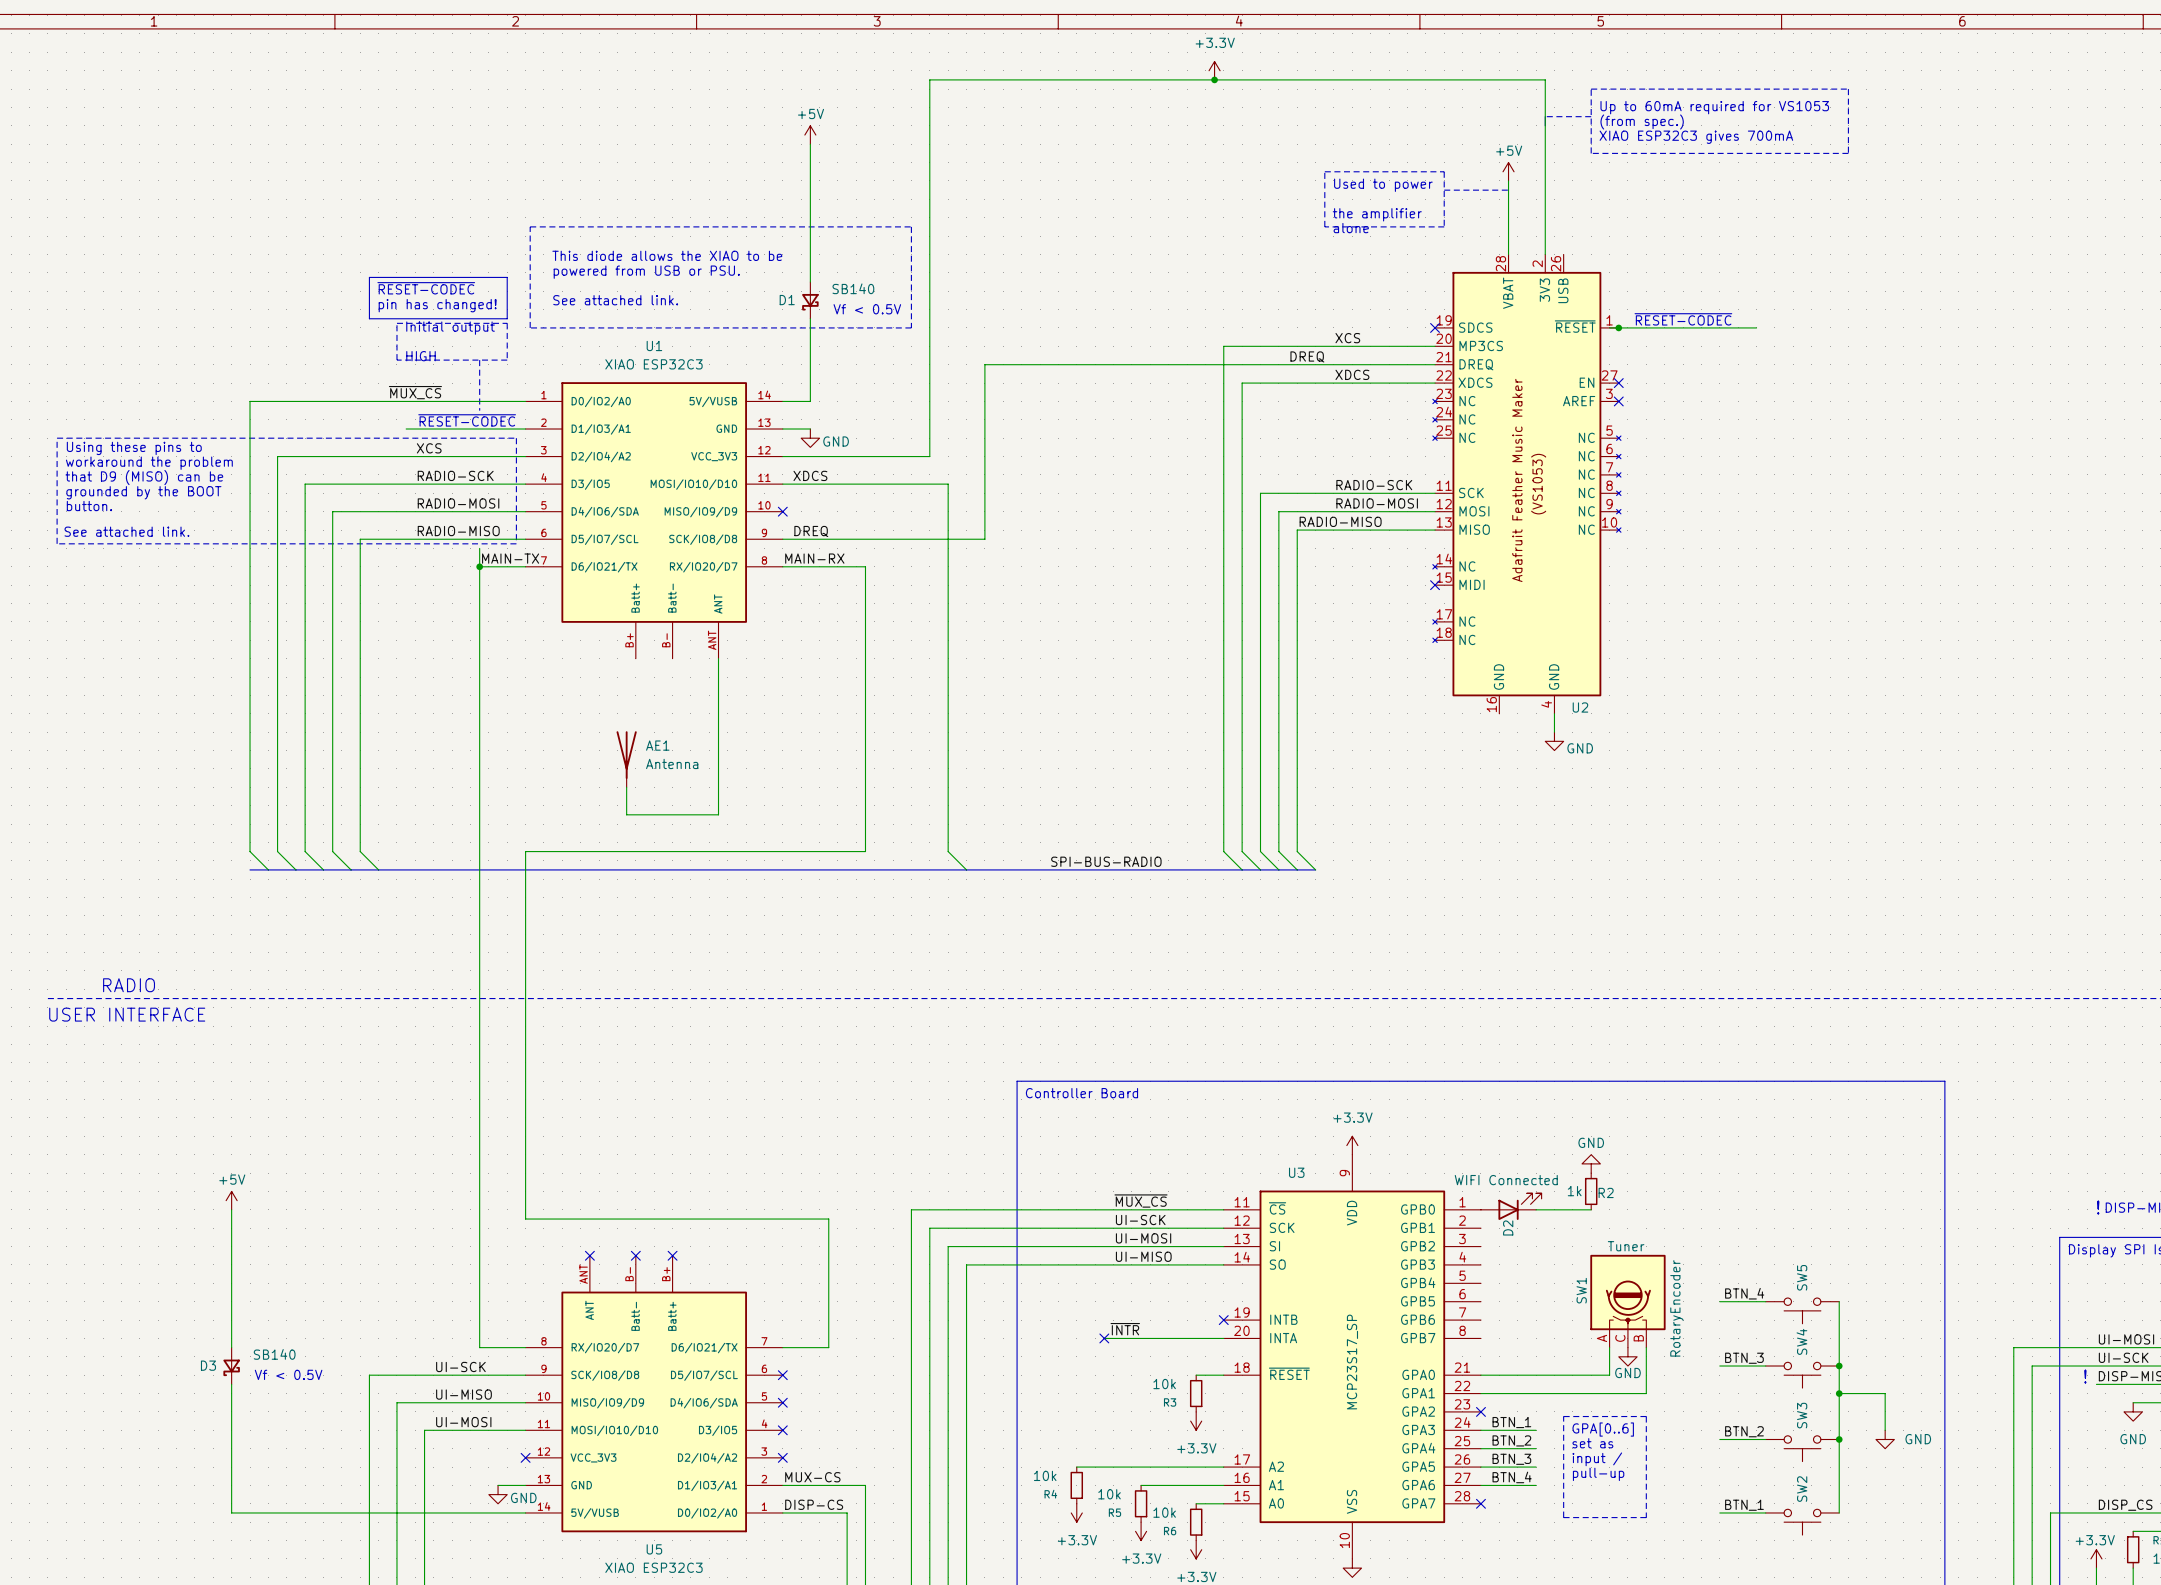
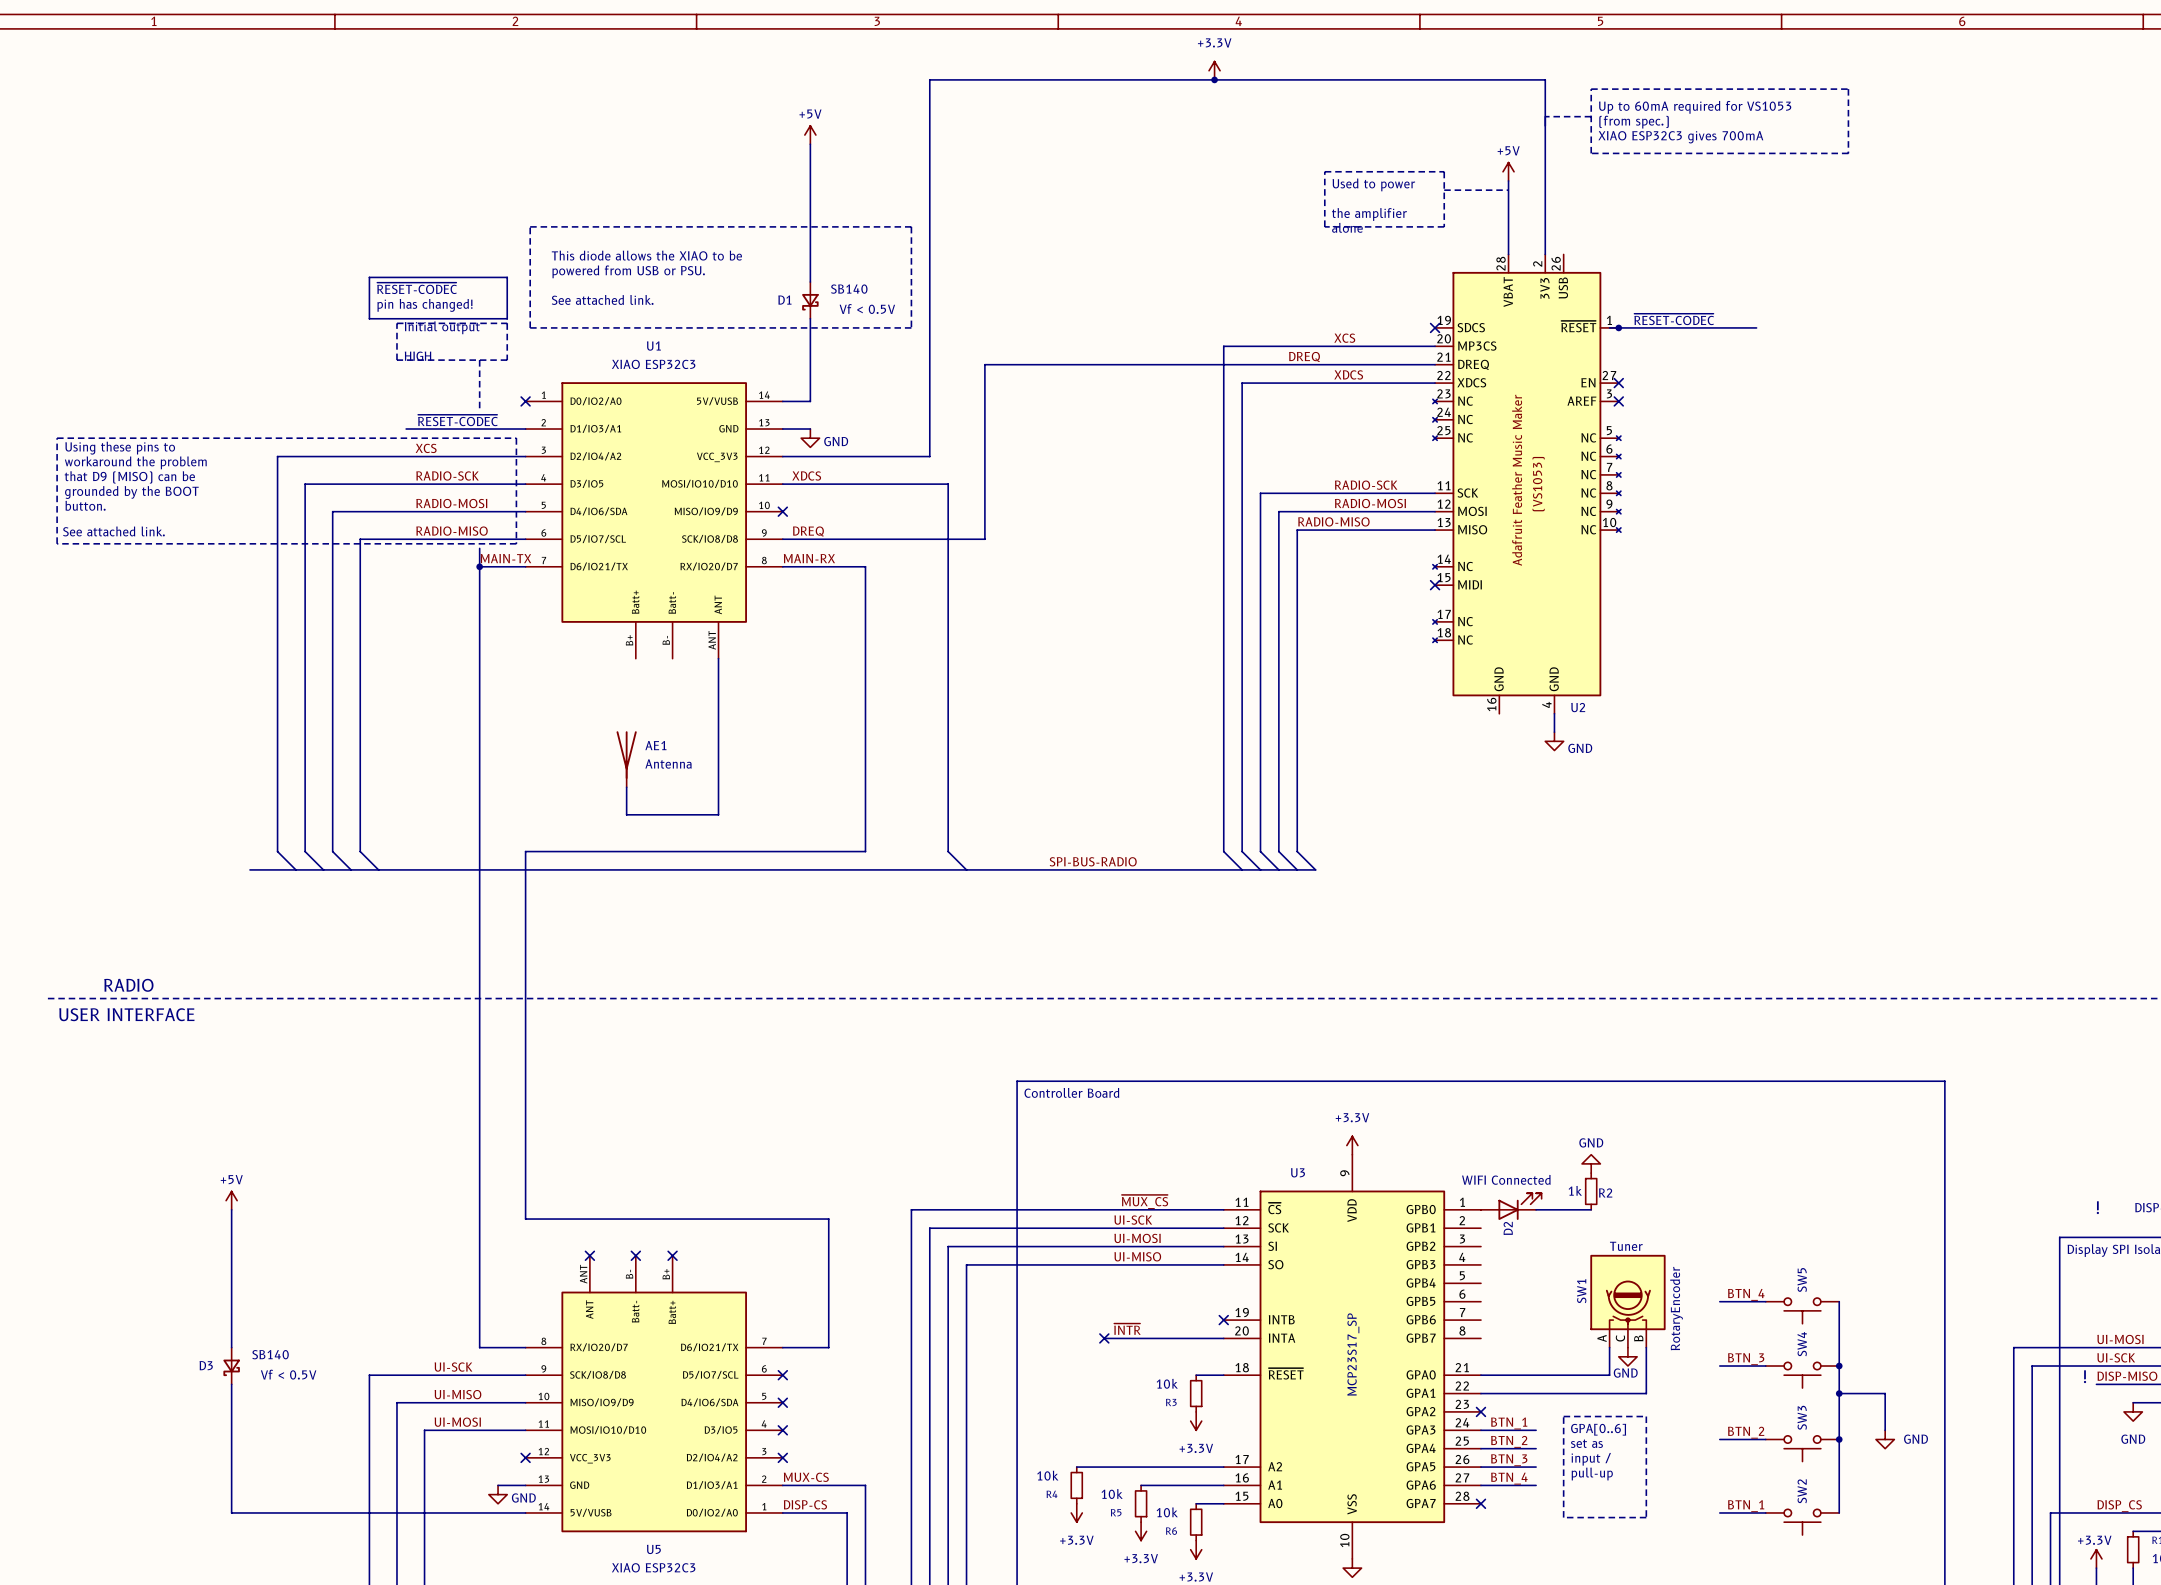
label: ~{MUX_CS} (415, 392) -> none
wire: (525, 401) (250, 401) (250, 851) (268, 869) -> none
no-connect mark: none -> (525, 401)

